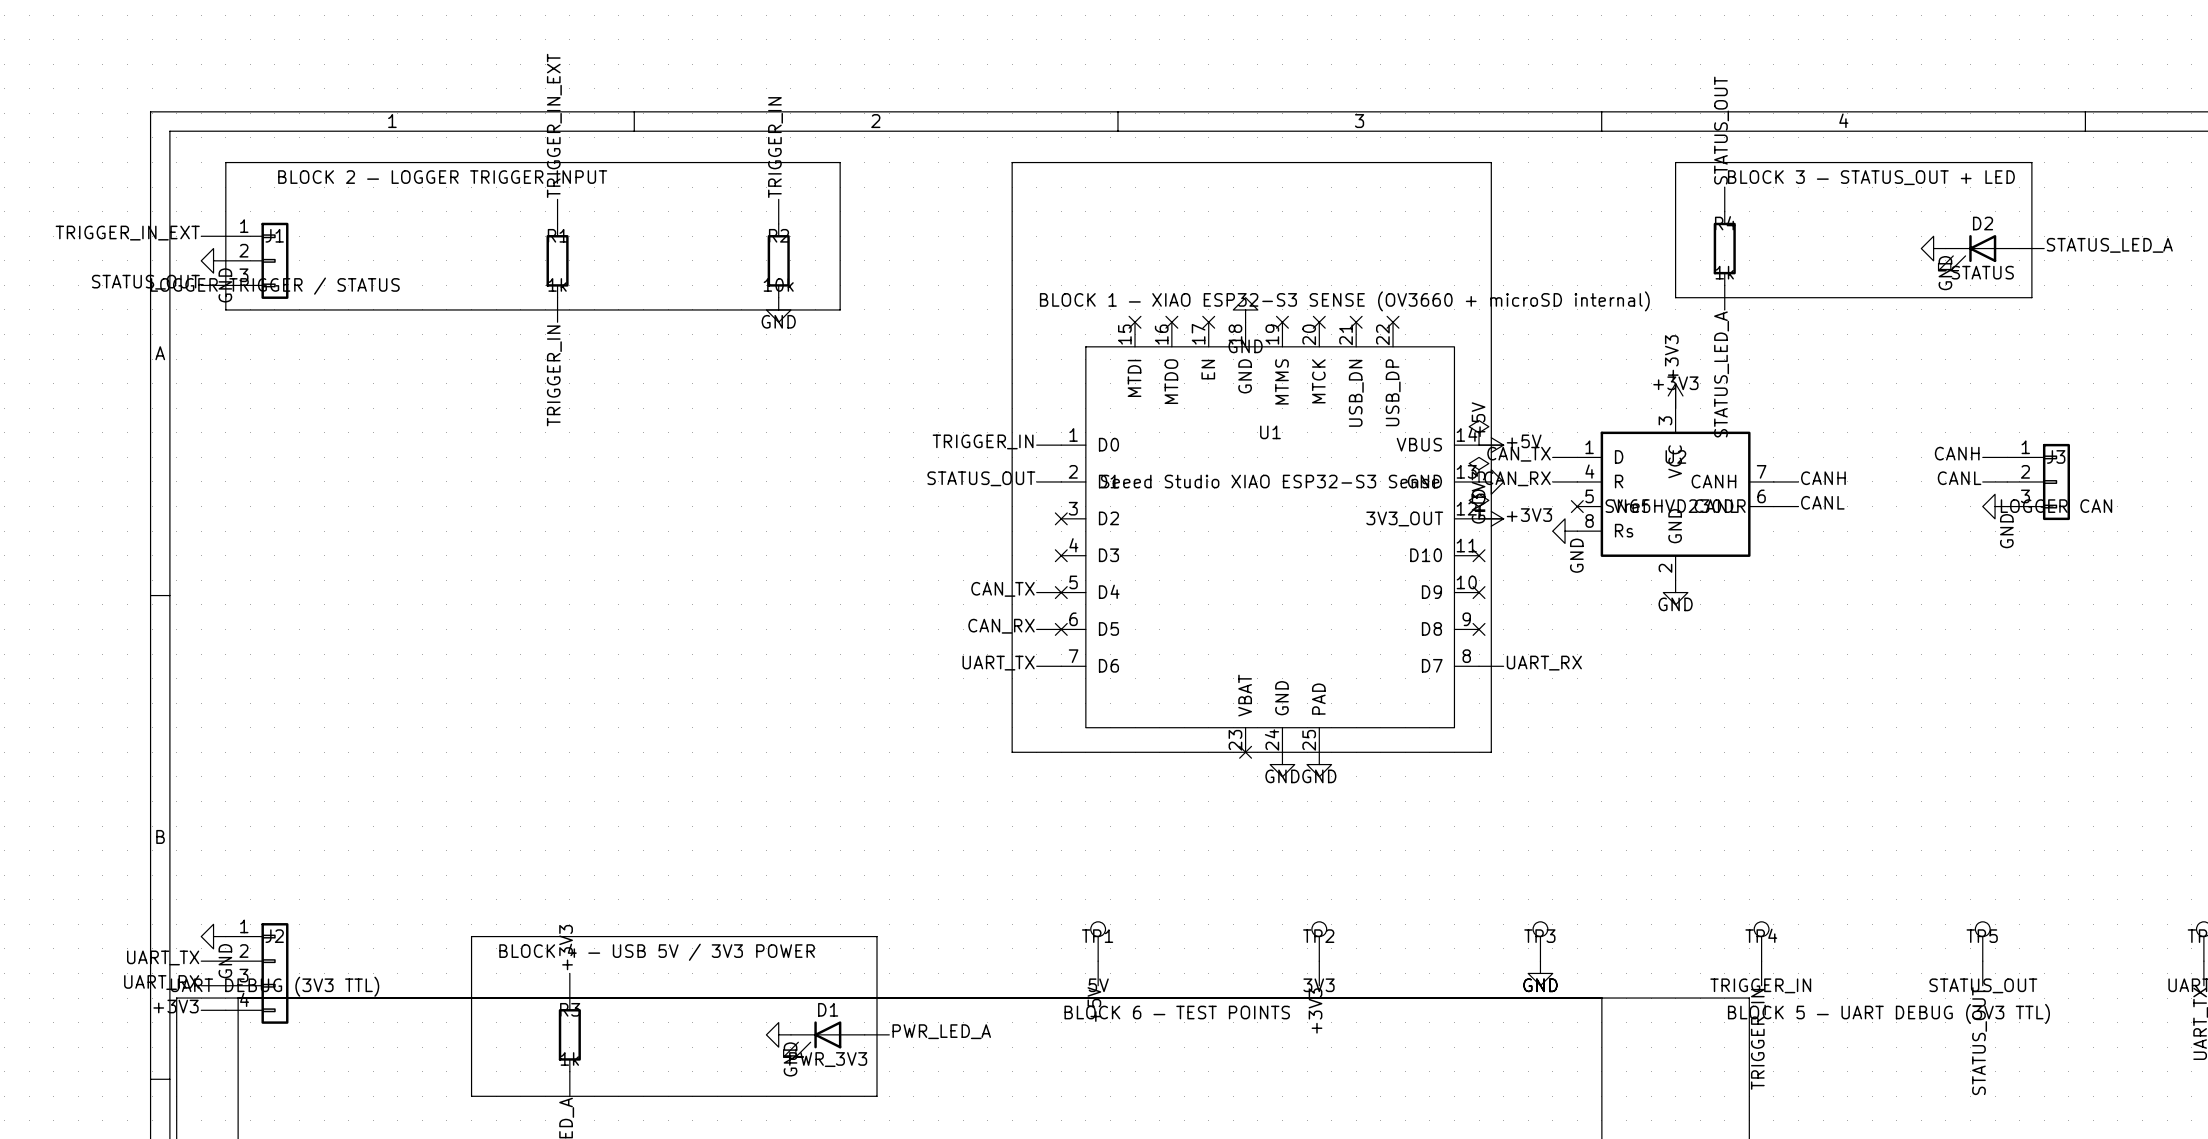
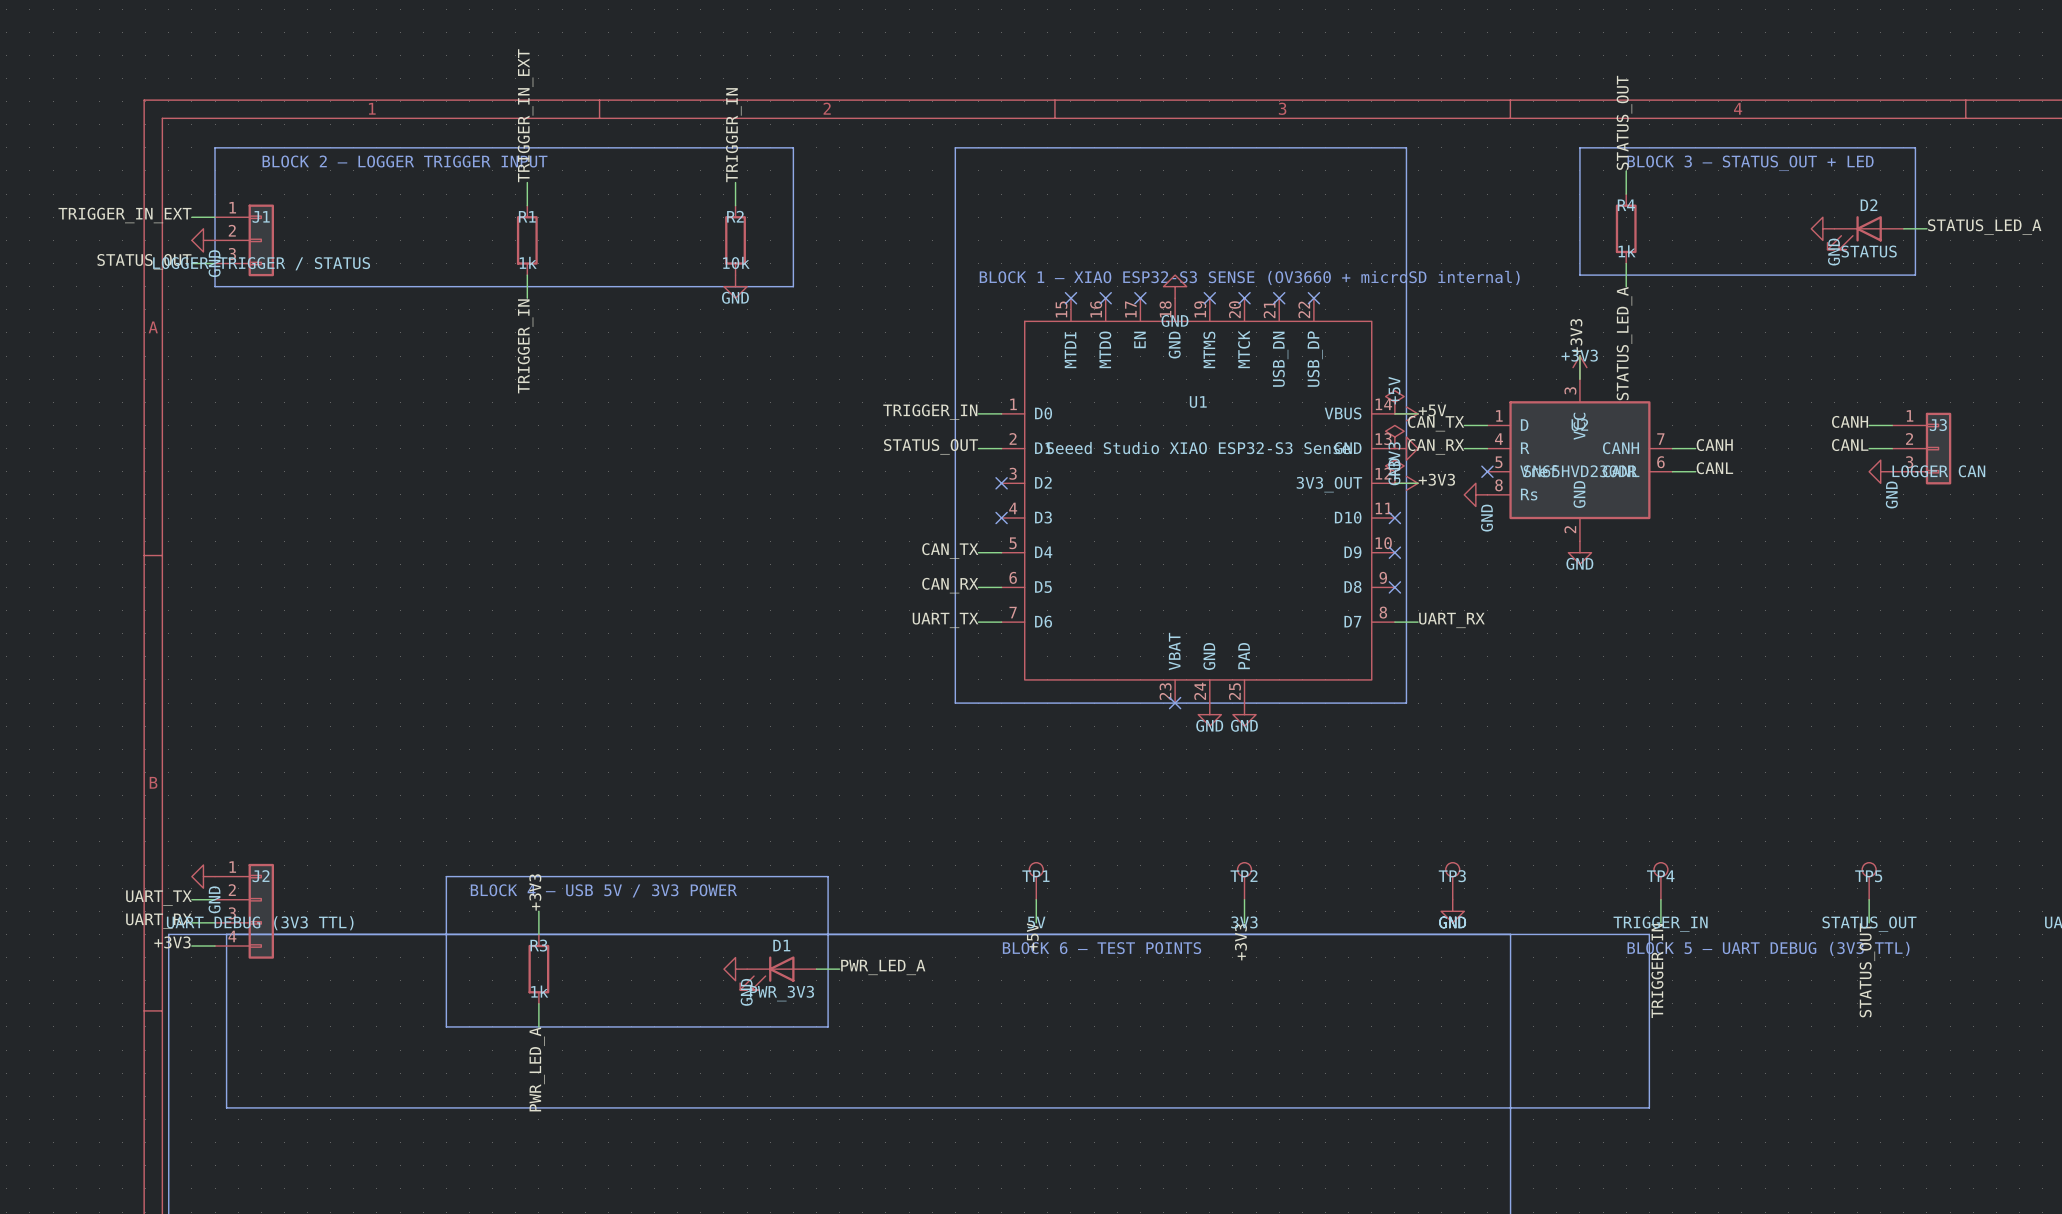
no-connect mark: (1061, 592) -> none
no-connect mark: (1061, 629) -> none

